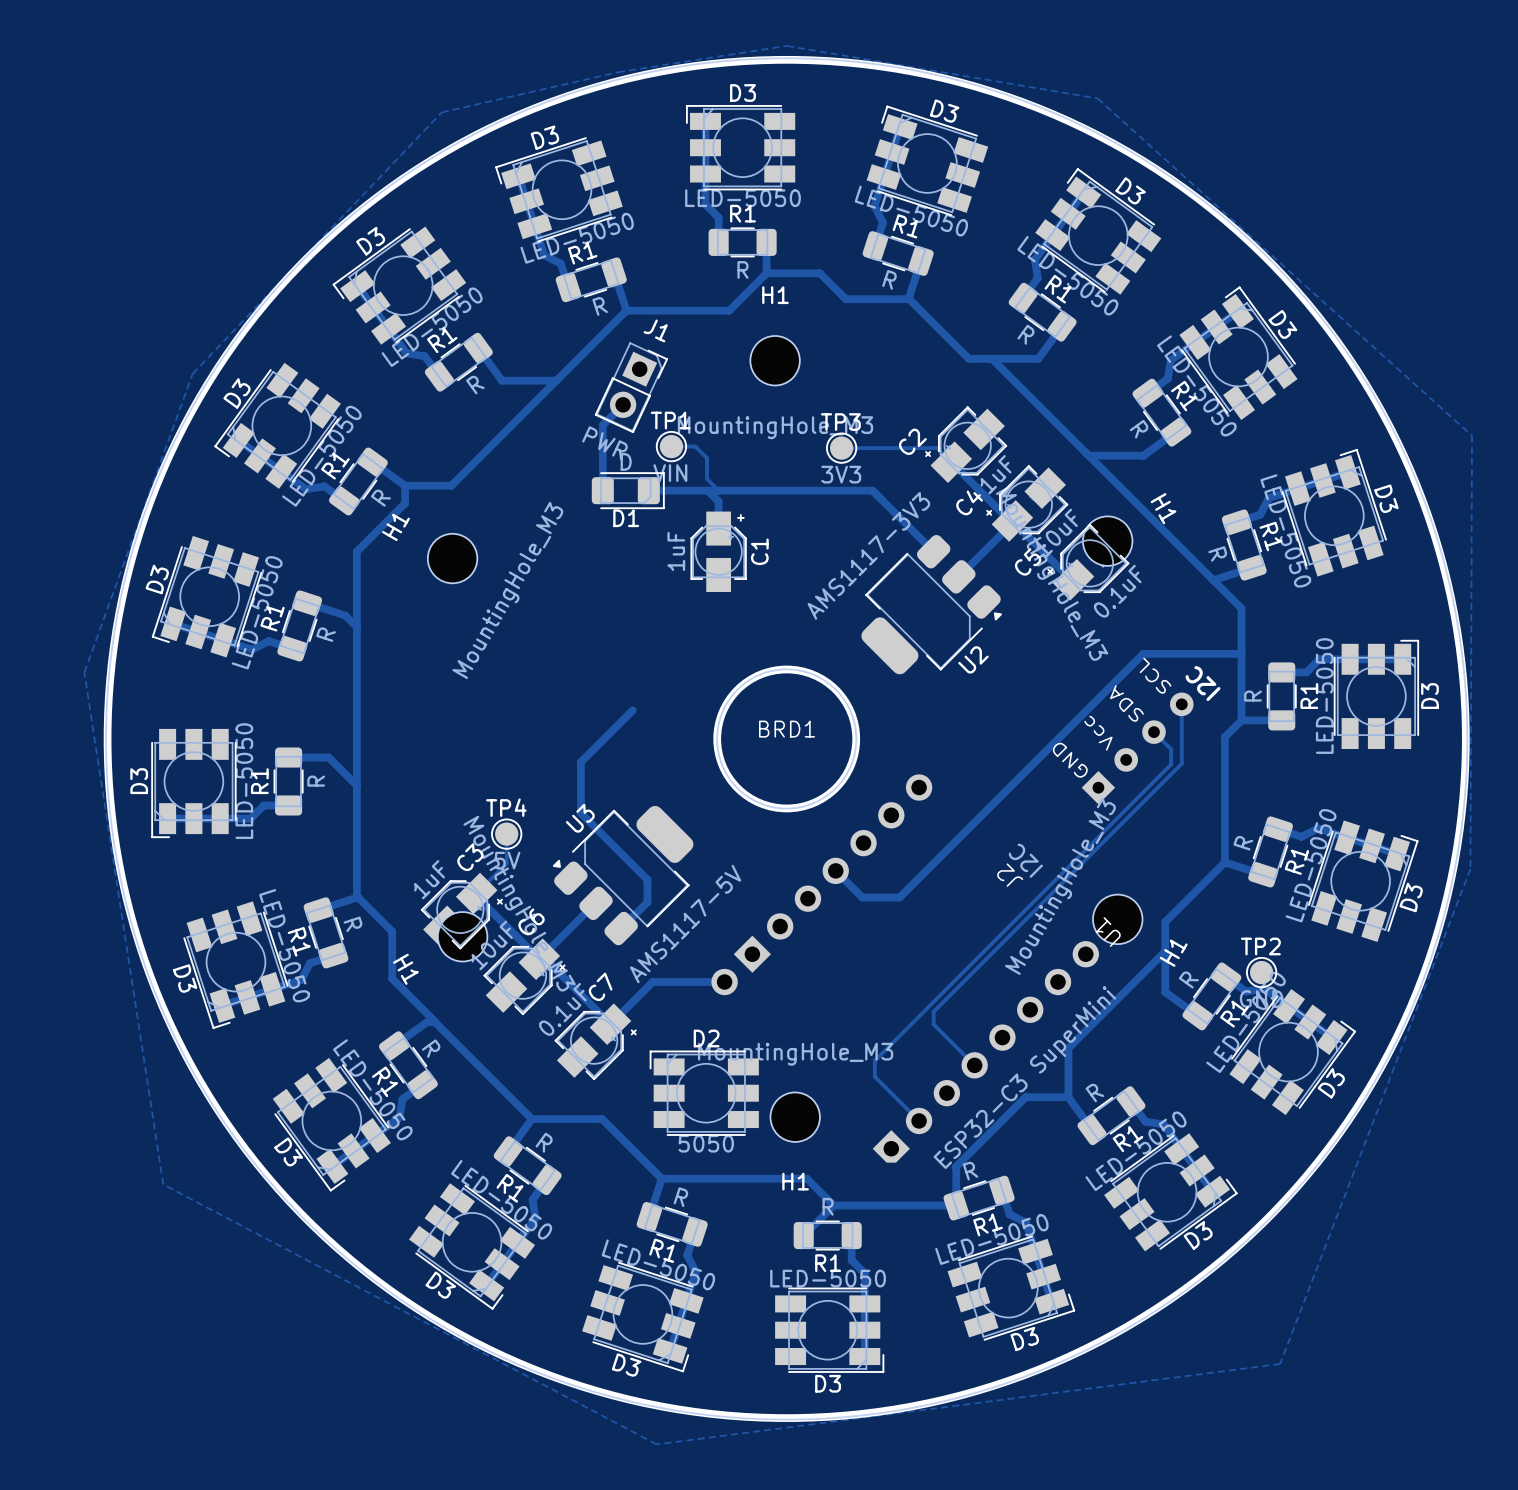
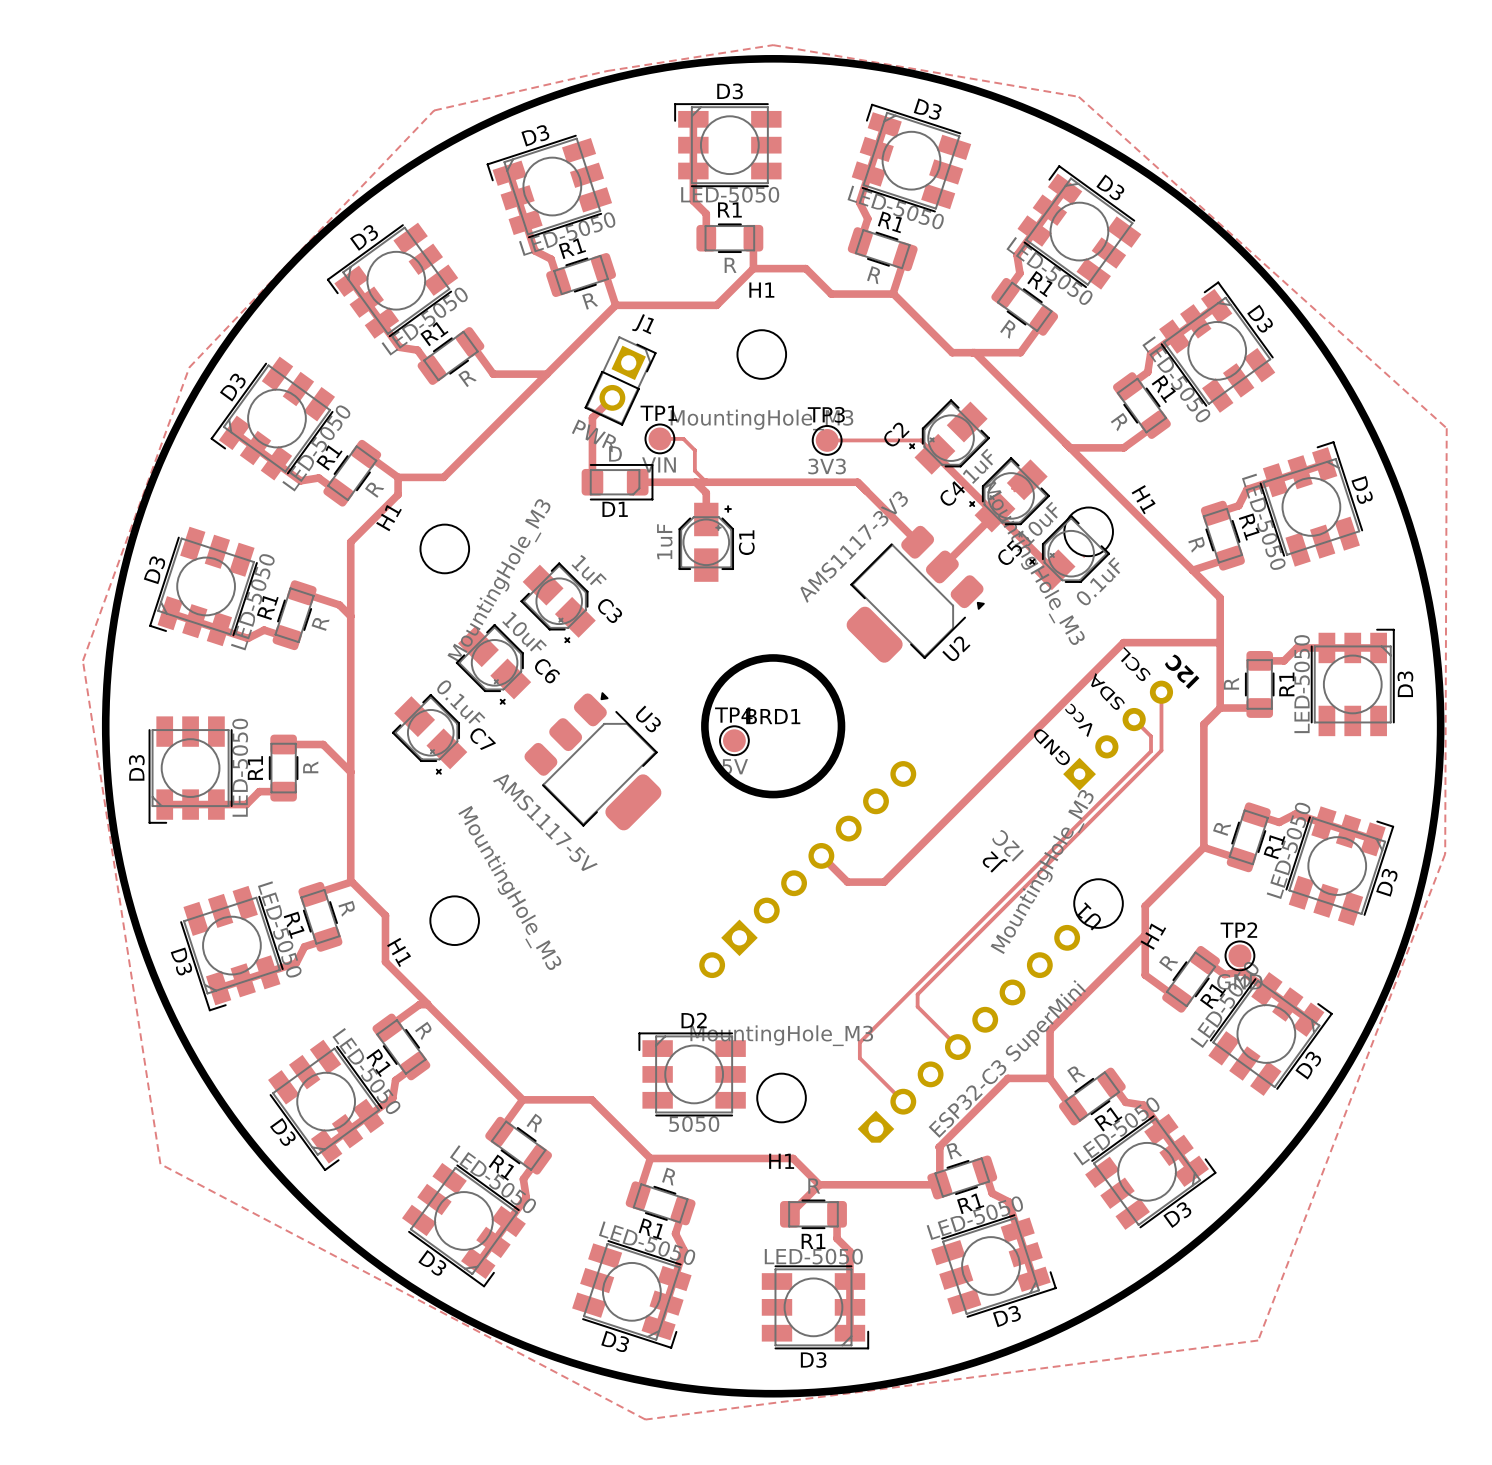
track: (632, 710) (580, 762) (580, 813) (647, 879) (647, 902) (621, 928) -> none
track: (506, 834) (506, 863) (476, 893) (476, 896) (539, 959) -> none
TP4 position: (506, 834) -> (734, 740)
U3 rotation: 0° (623, 875) -> 90° clockwise (592, 761)
U3 position: (623, 875) -> (592, 761)
track: (596, 903) (539, 959) -> none
C3 rotation: 0° (461, 911) -> 90° clockwise (558, 602)
C3 position: (461, 911) -> (558, 602)
track: (539, 959) (545, 959) (610, 1024) (652, 982) (724, 982) -> none
C6 rotation: 0° (524, 976) -> 90° clockwise (493, 664)
C6 position: (524, 976) -> (493, 664)
C7 rotation: 0° (595, 1041) -> 90° clockwise (429, 734)
C7 position: (595, 1041) -> (429, 734)

